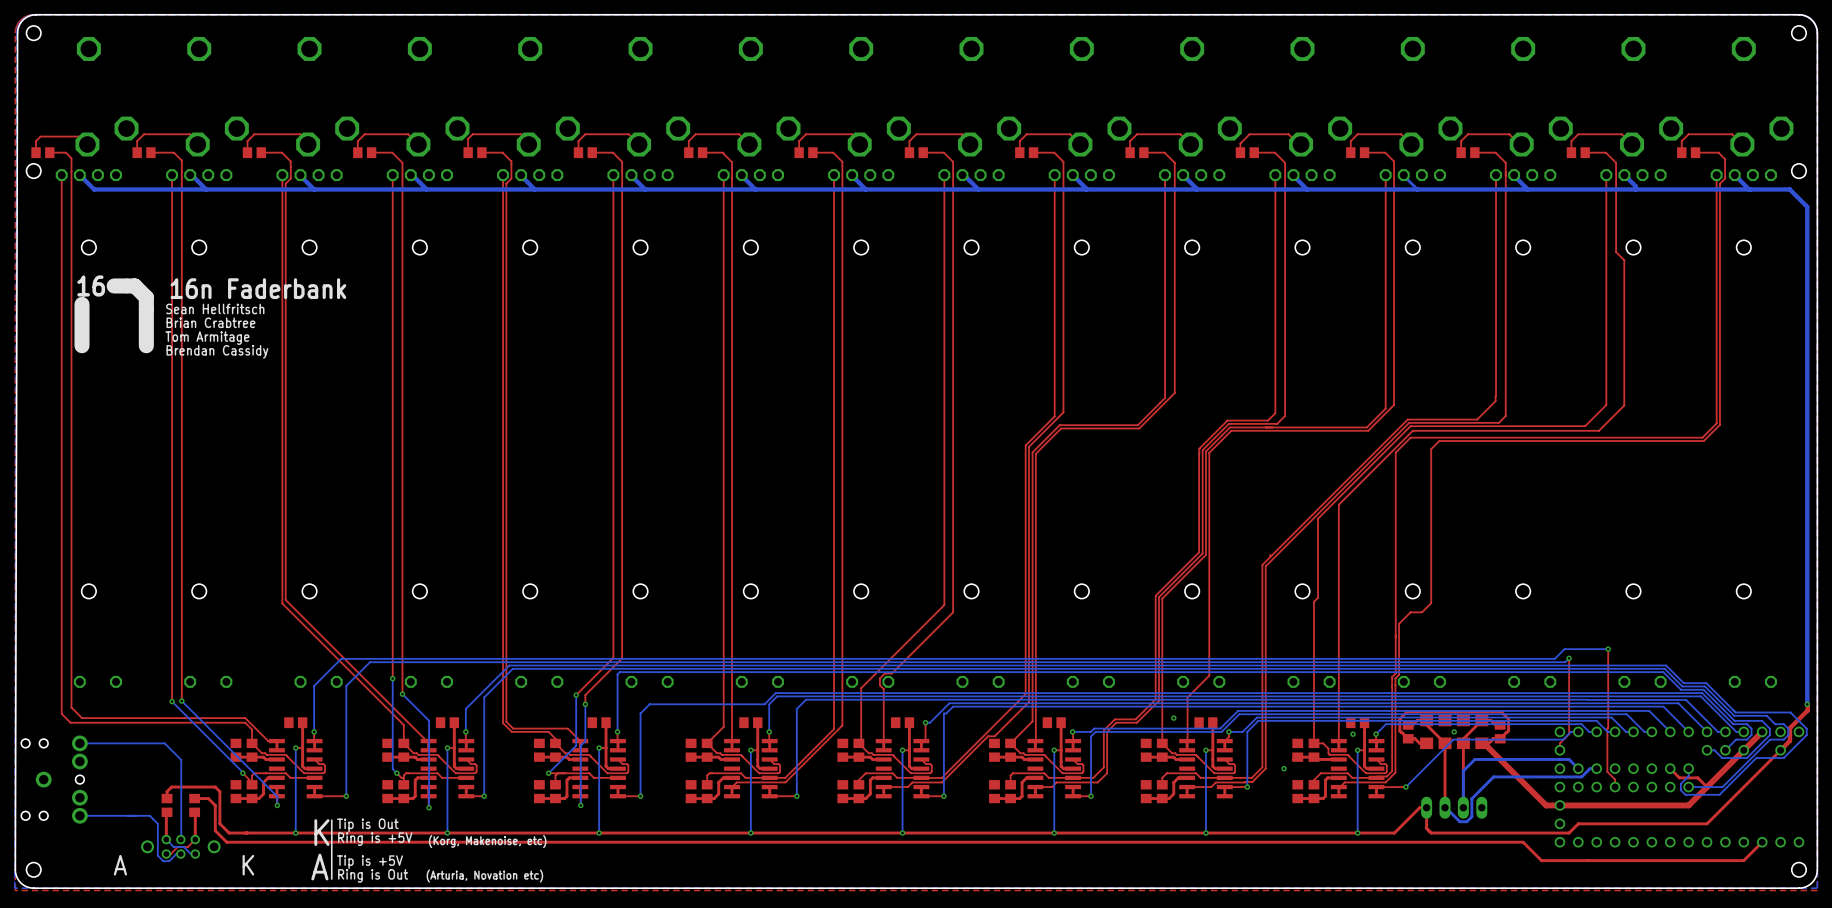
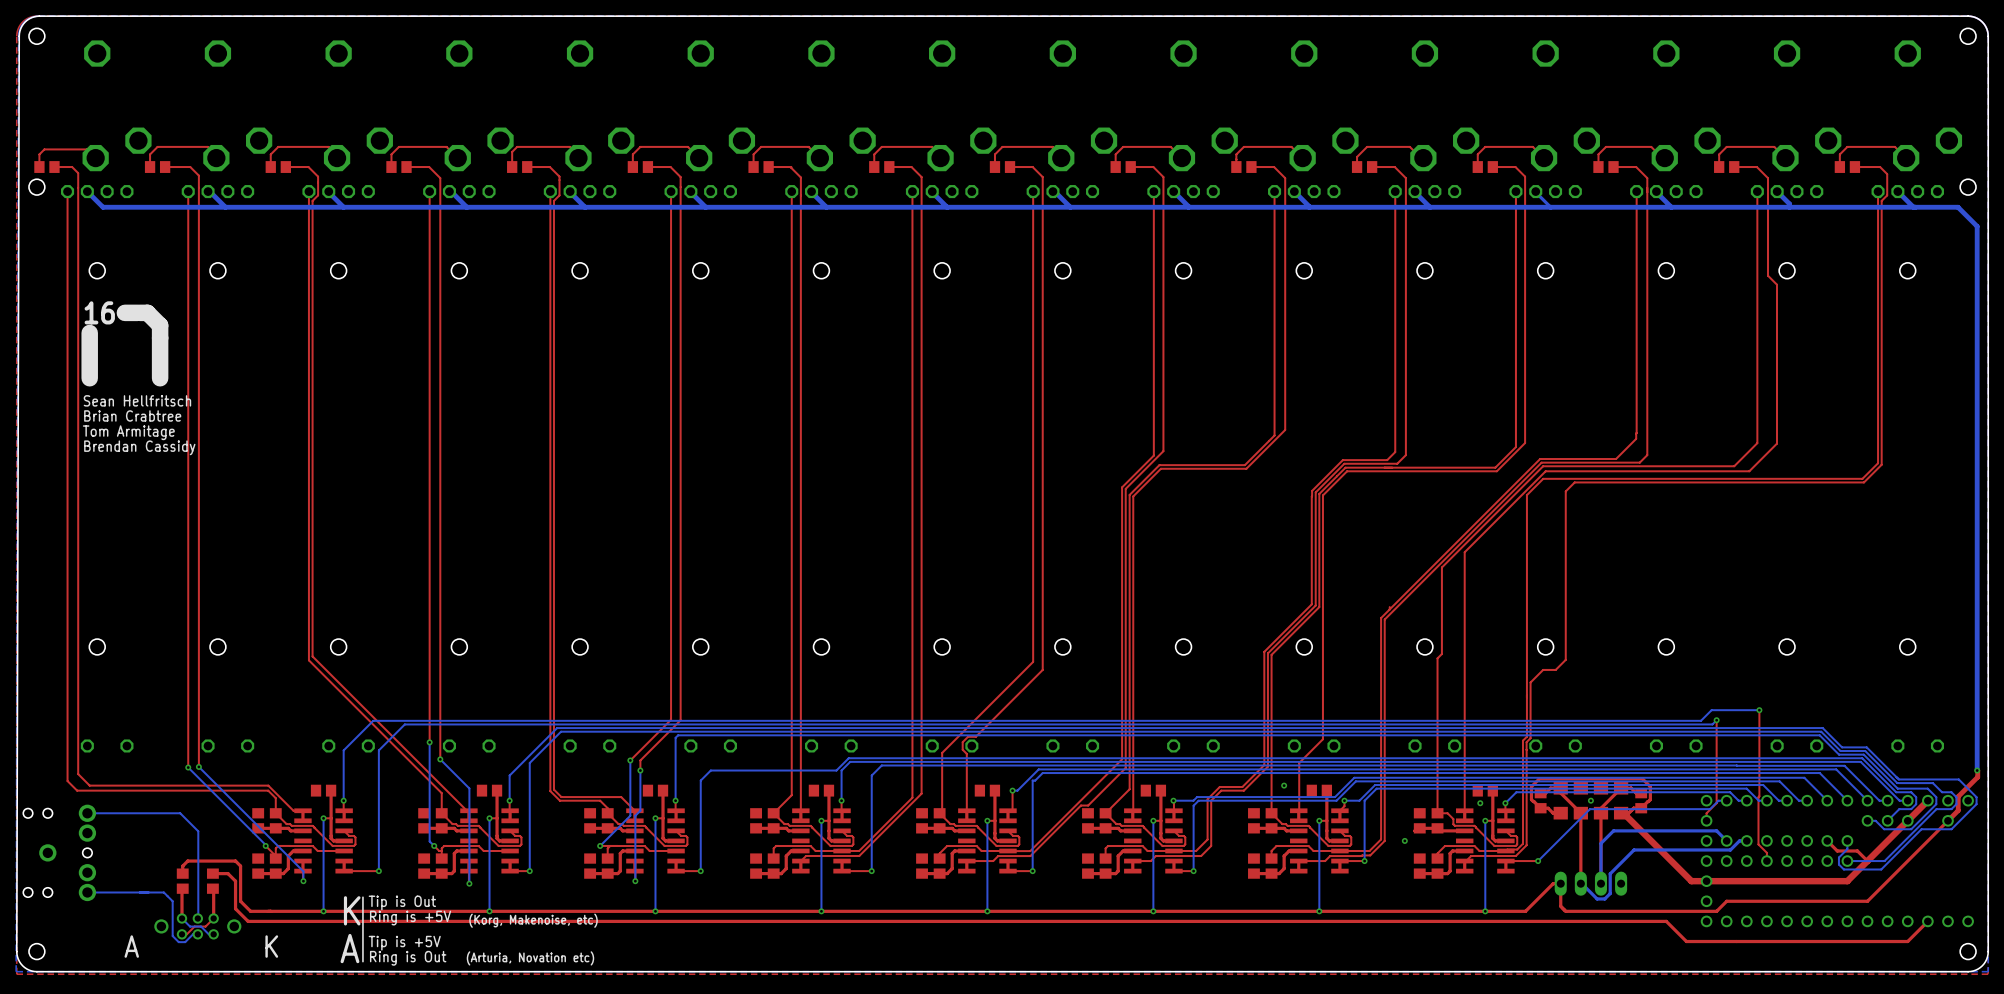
text: 16n Faderbank (258, 288) -> none
text position: Sean Hellfritsch (215, 308) -> Sean Hellfritsch (137, 400)
text position: Brian Crabtree (210, 322) -> Brian Crabtree (132, 415)
text position: Tom Armitage (207, 338) -> Tom Armitage (128, 432)
text position: Brendan Cassidy (217, 351) -> Brendan Cassidy (139, 447)

